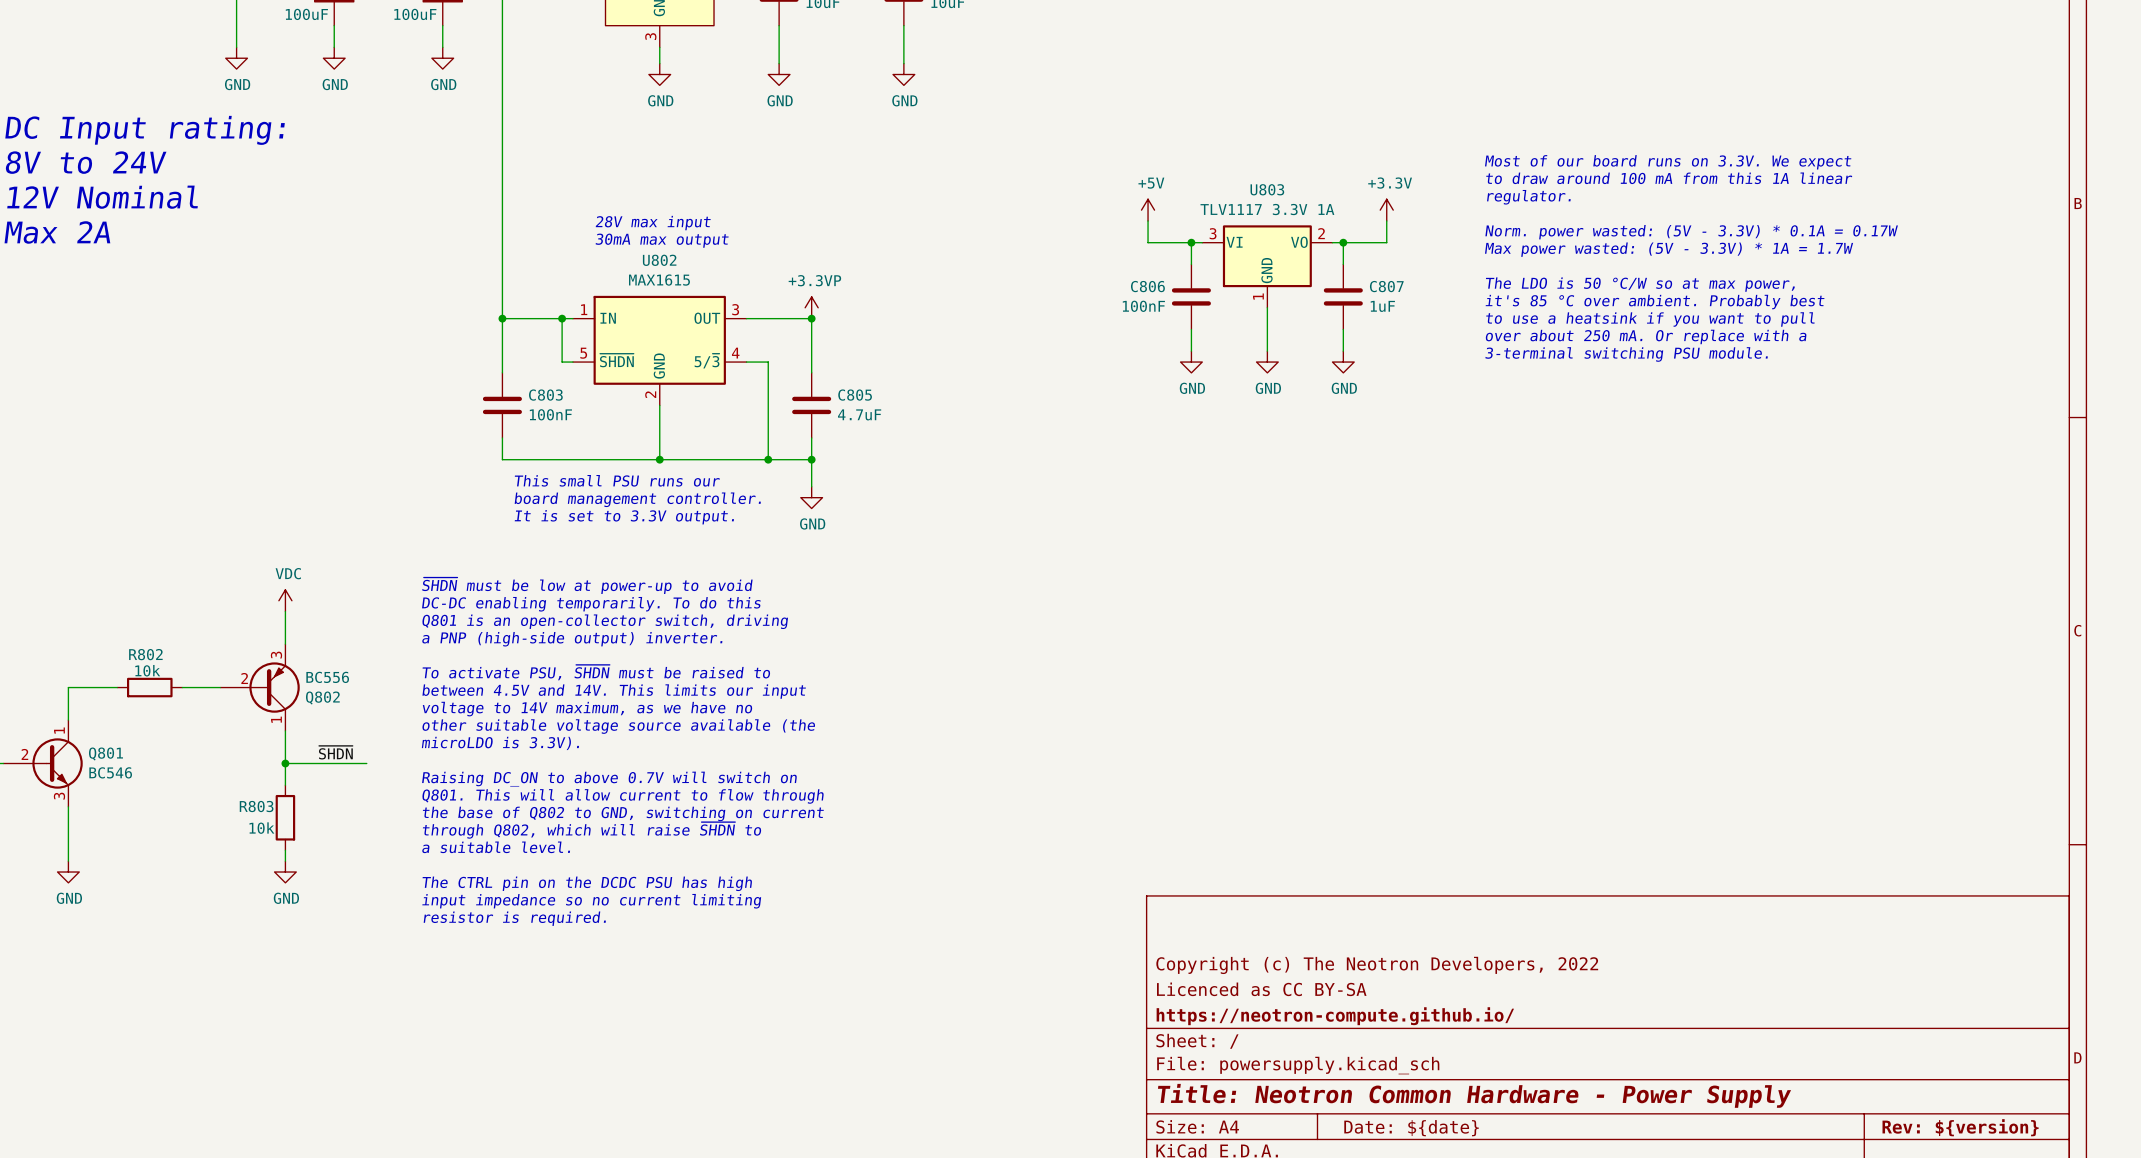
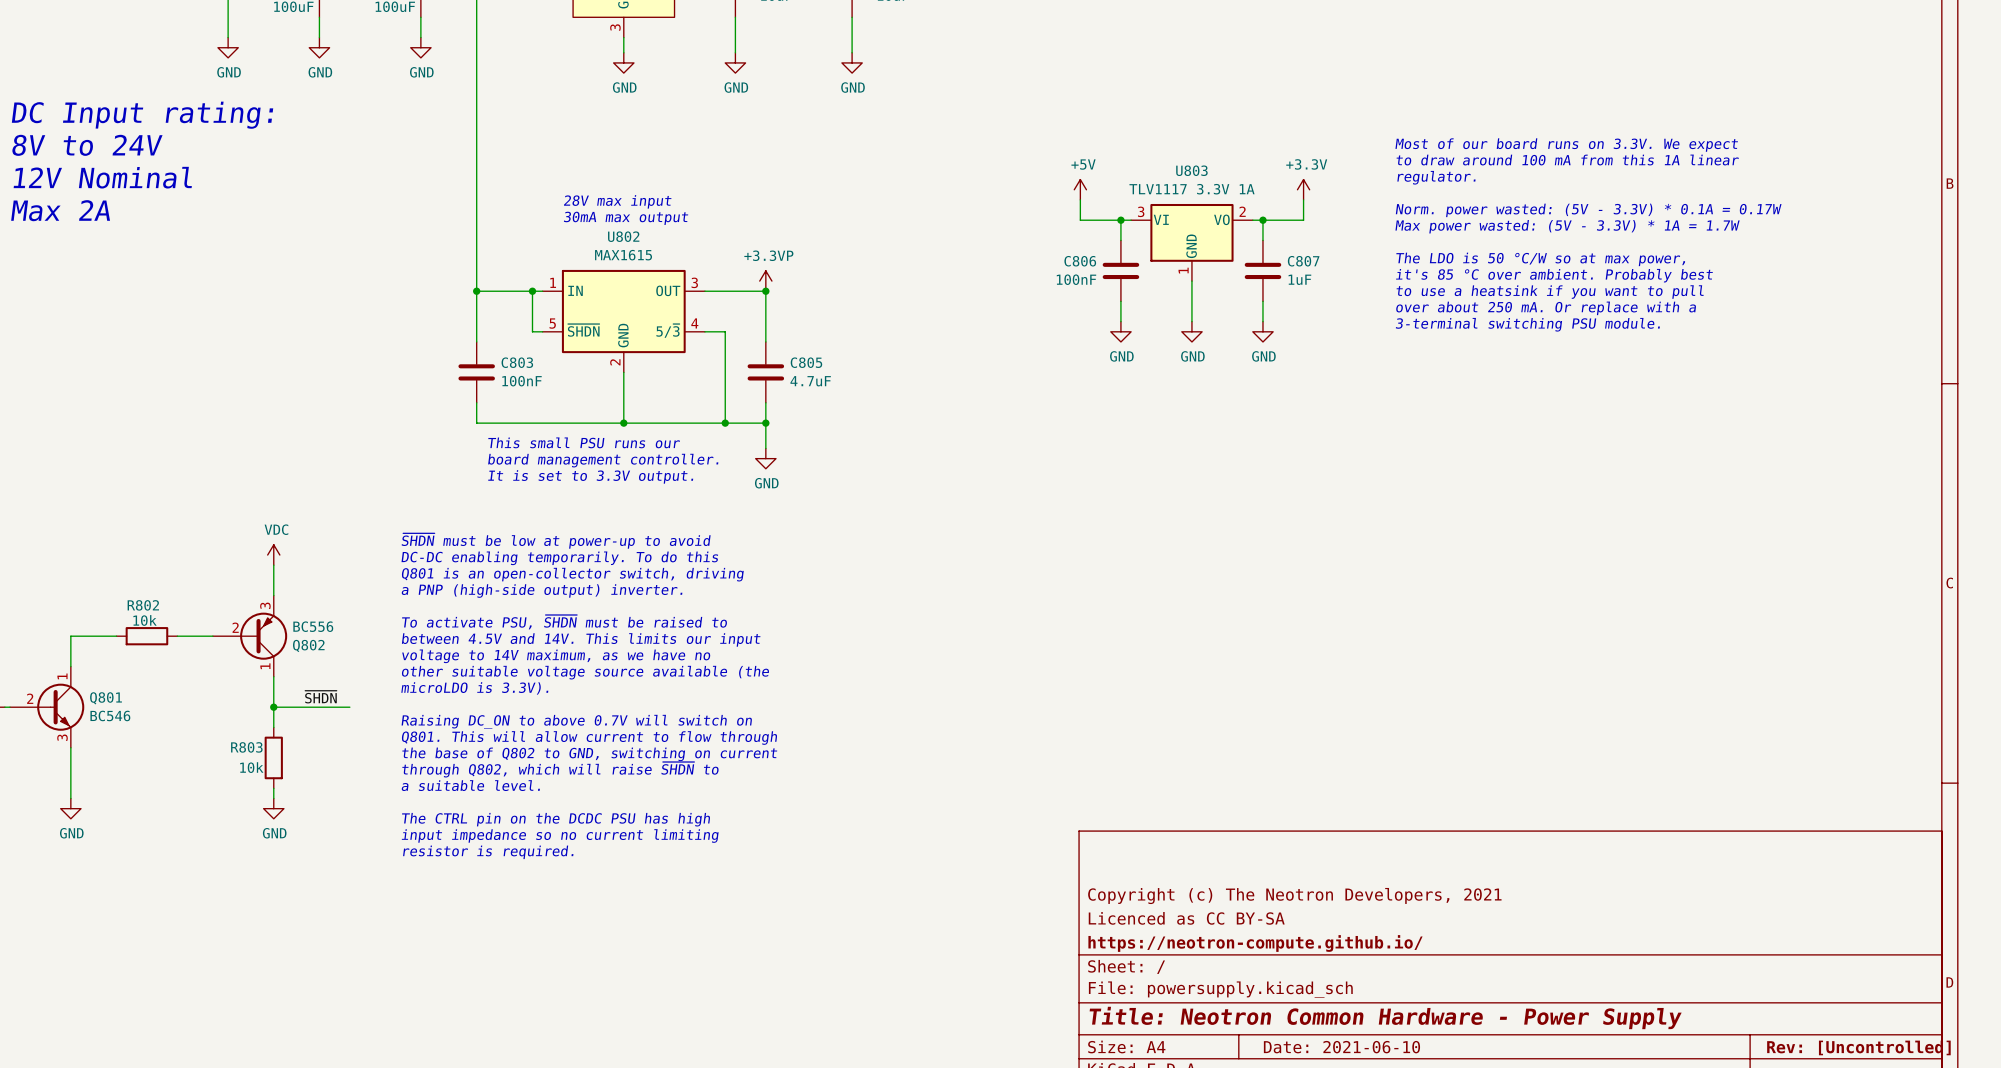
title block: Copyright (c) The Neotron Developers, 2022 (1377, 965) -> Copyright (c) The Neotron Developers, 2021 (1294, 896)
title block: Rev: ${version} (1960, 1127) -> Rev: [Uncontrolled] (1858, 1047)
title block: Date: ${date} (1411, 1128) -> Date: 2021-06-10 (1341, 1047)

